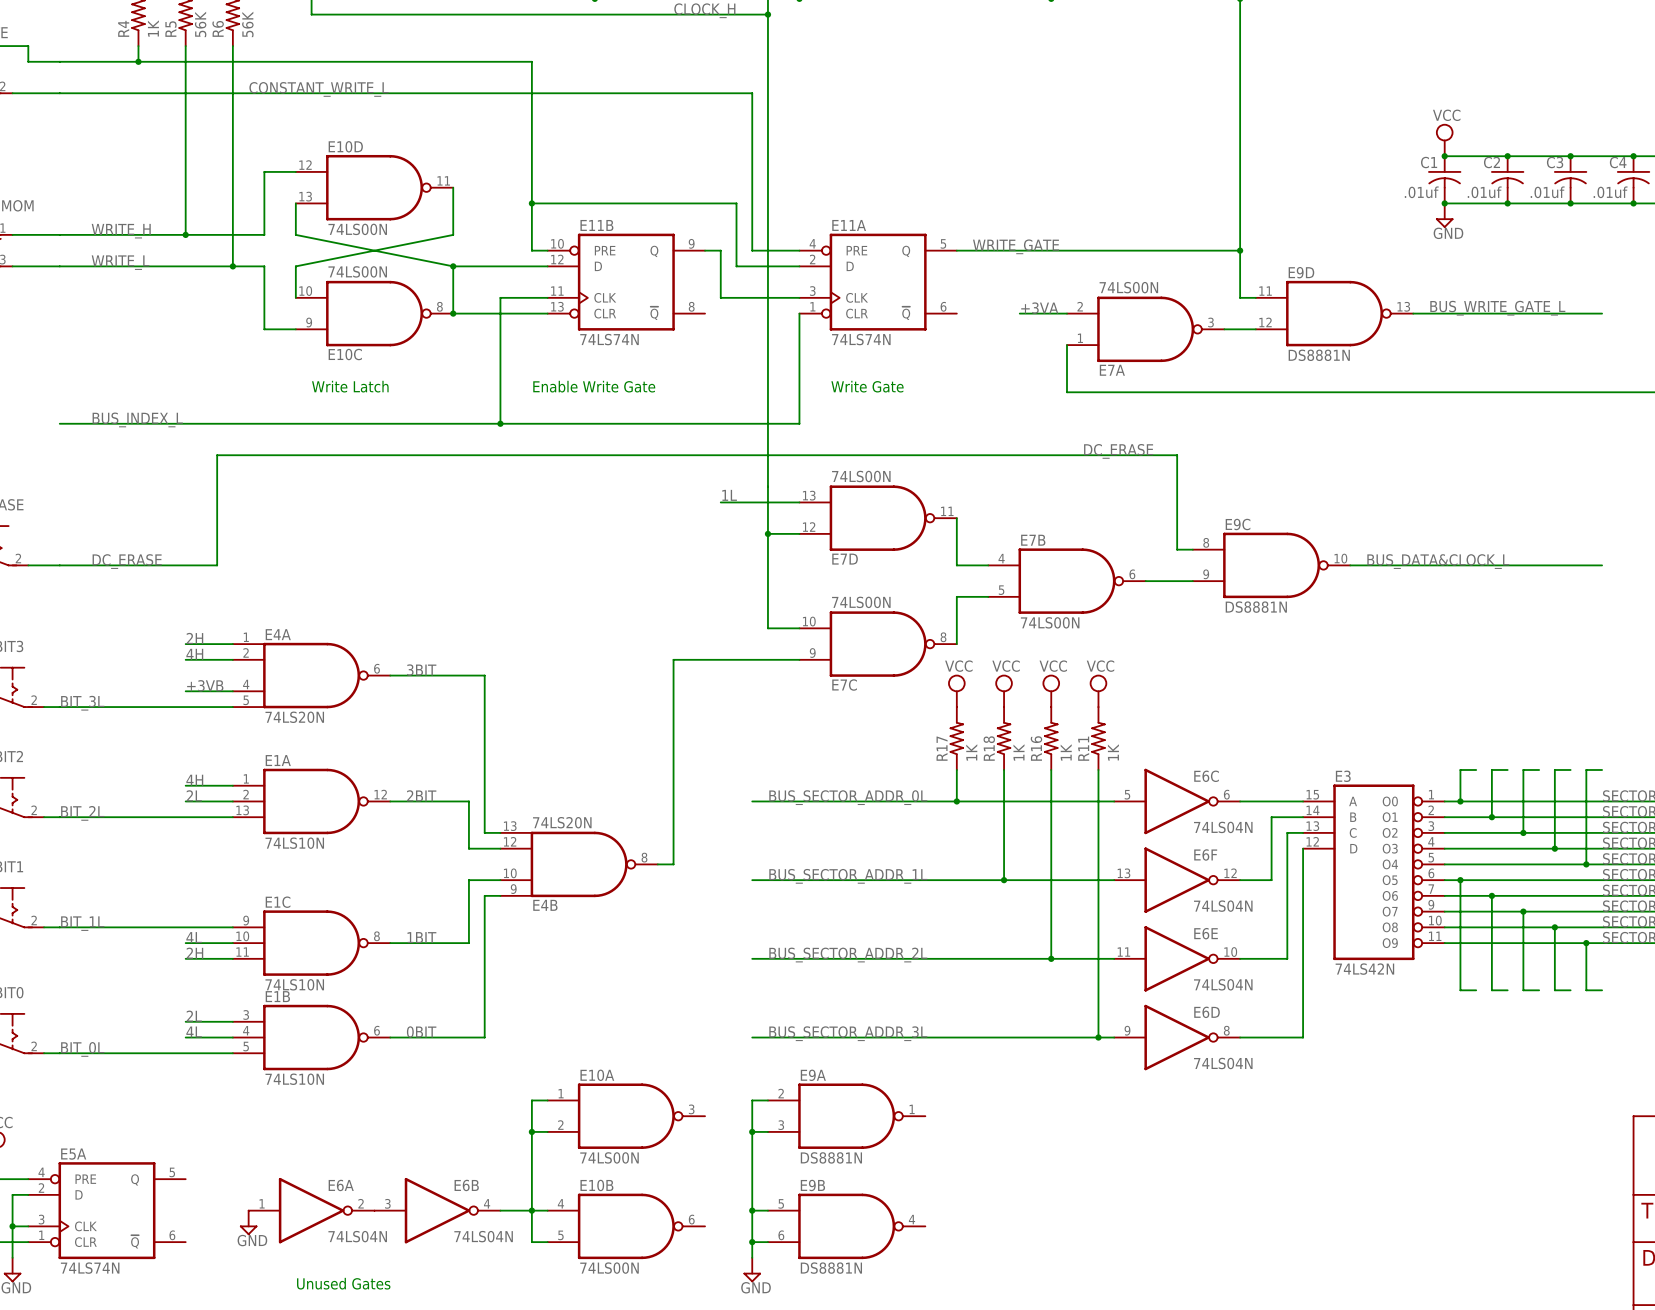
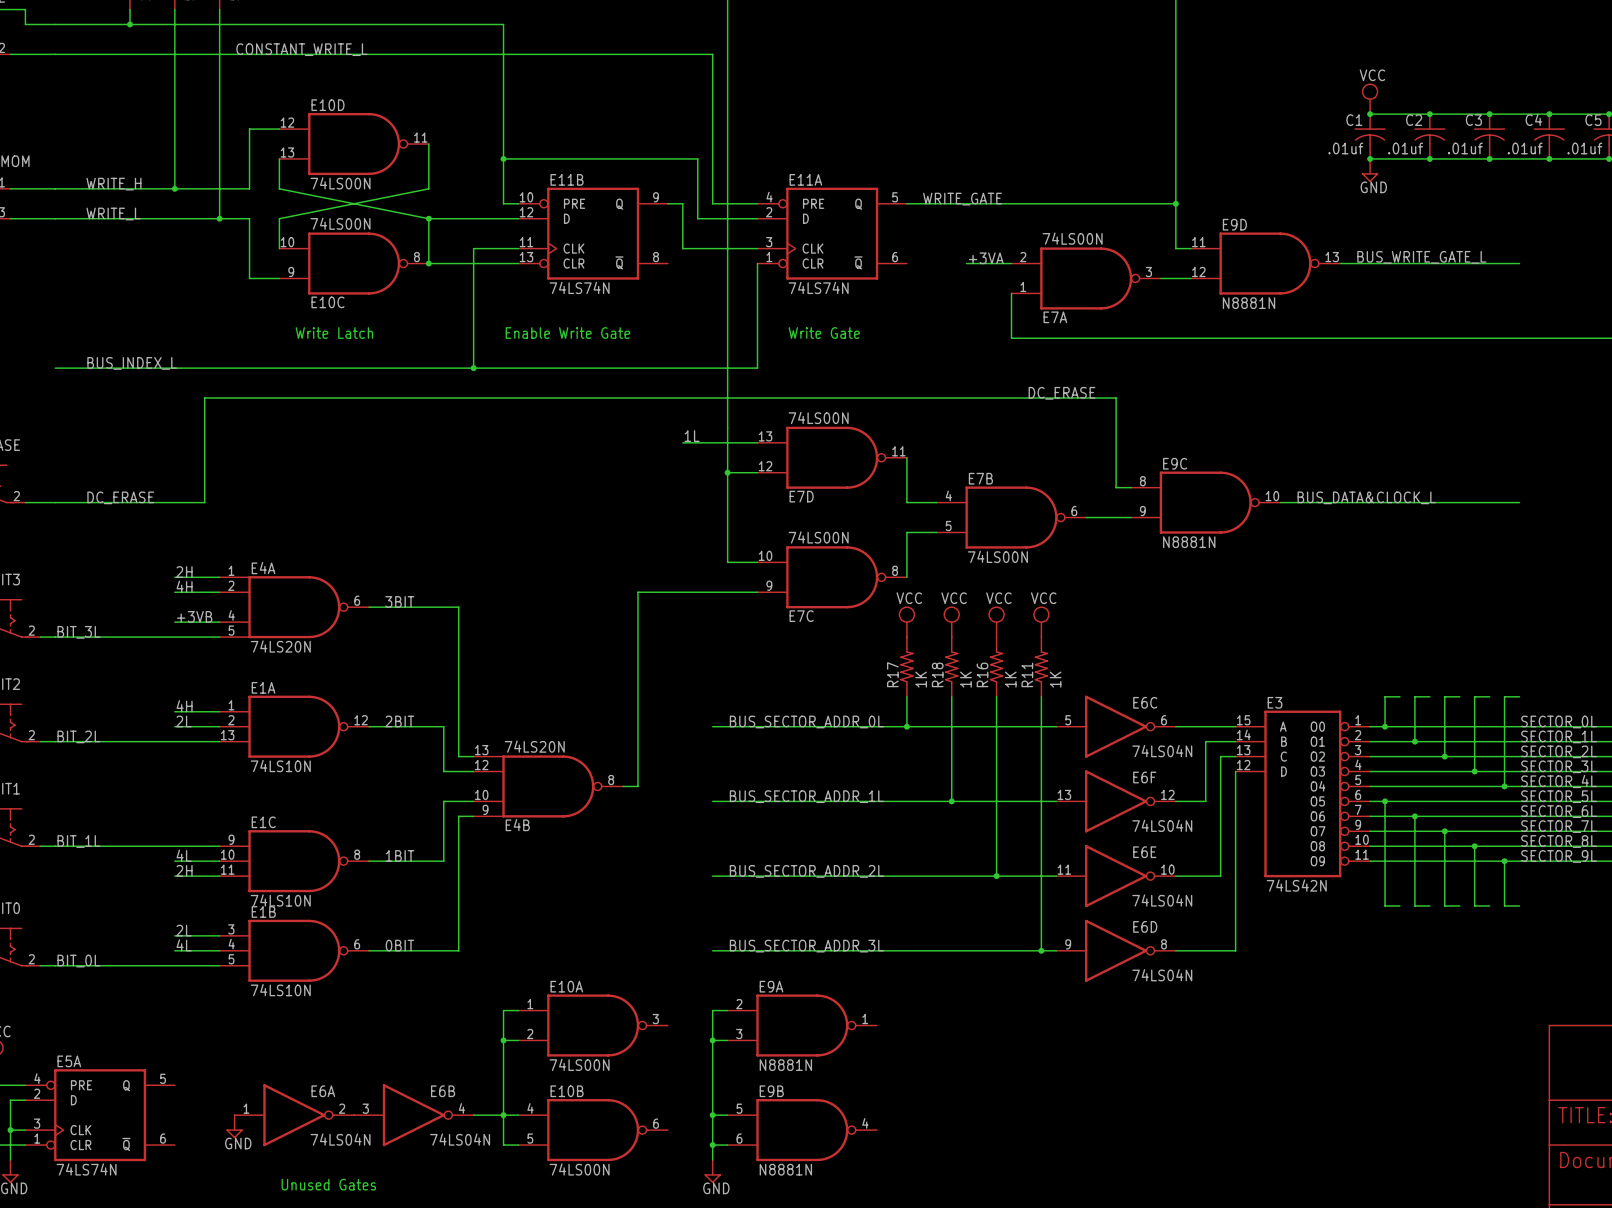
E9D value: DS8881N (1319, 355) -> N8881N (1249, 303)
E9C value: DS8881N (1256, 607) -> N8881N (1189, 542)
E9A value: DS8881N (831, 1157) -> N8881N (785, 1065)
E9B value: DS8881N (831, 1268) -> N8881N (785, 1169)

